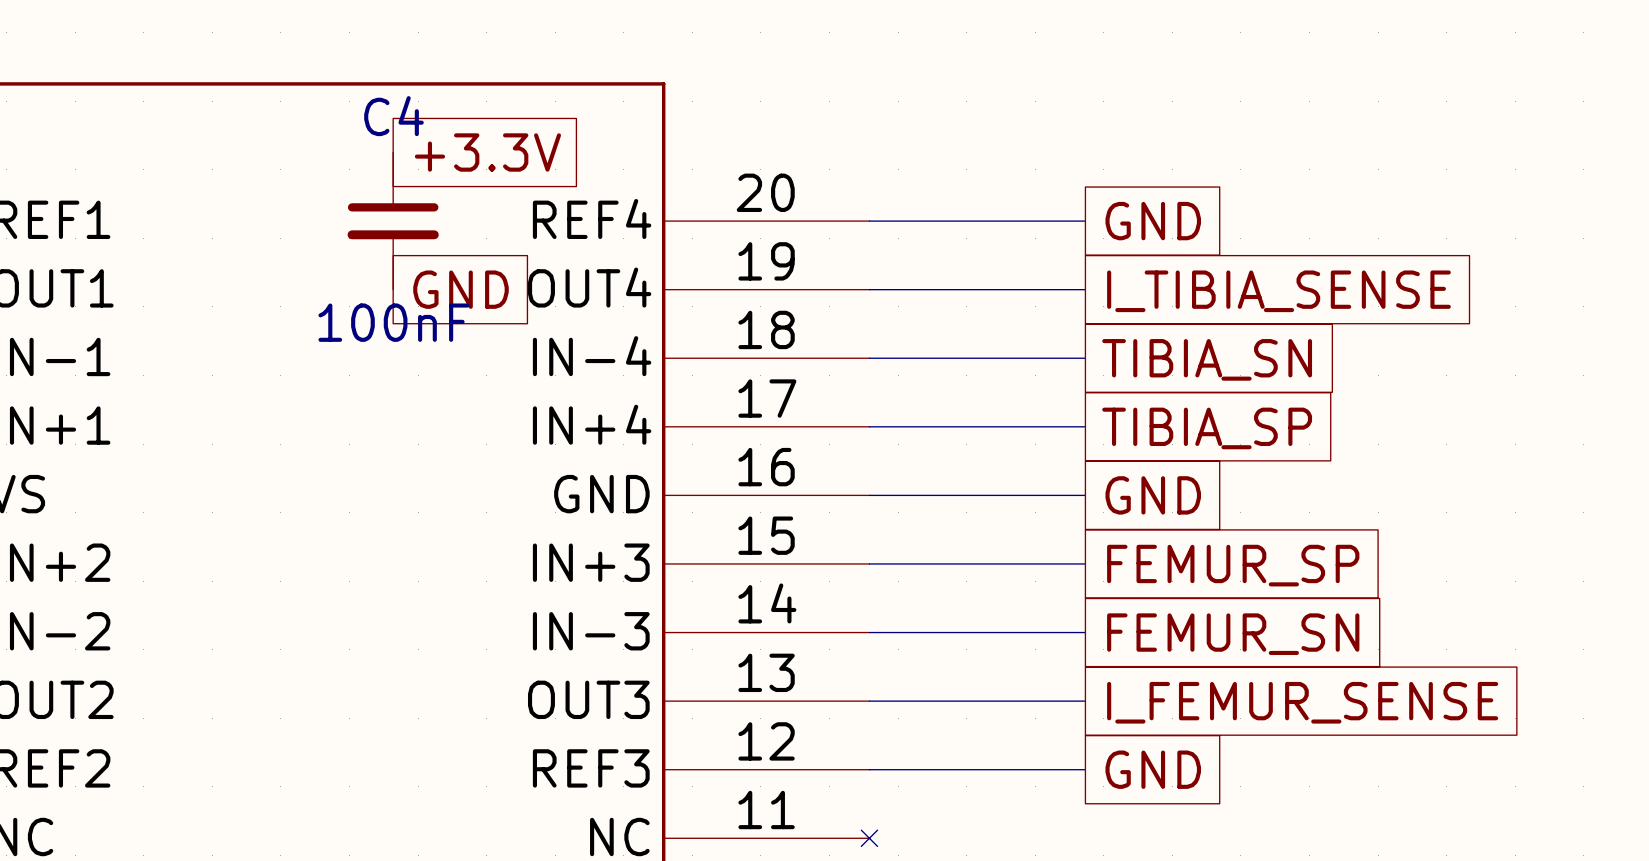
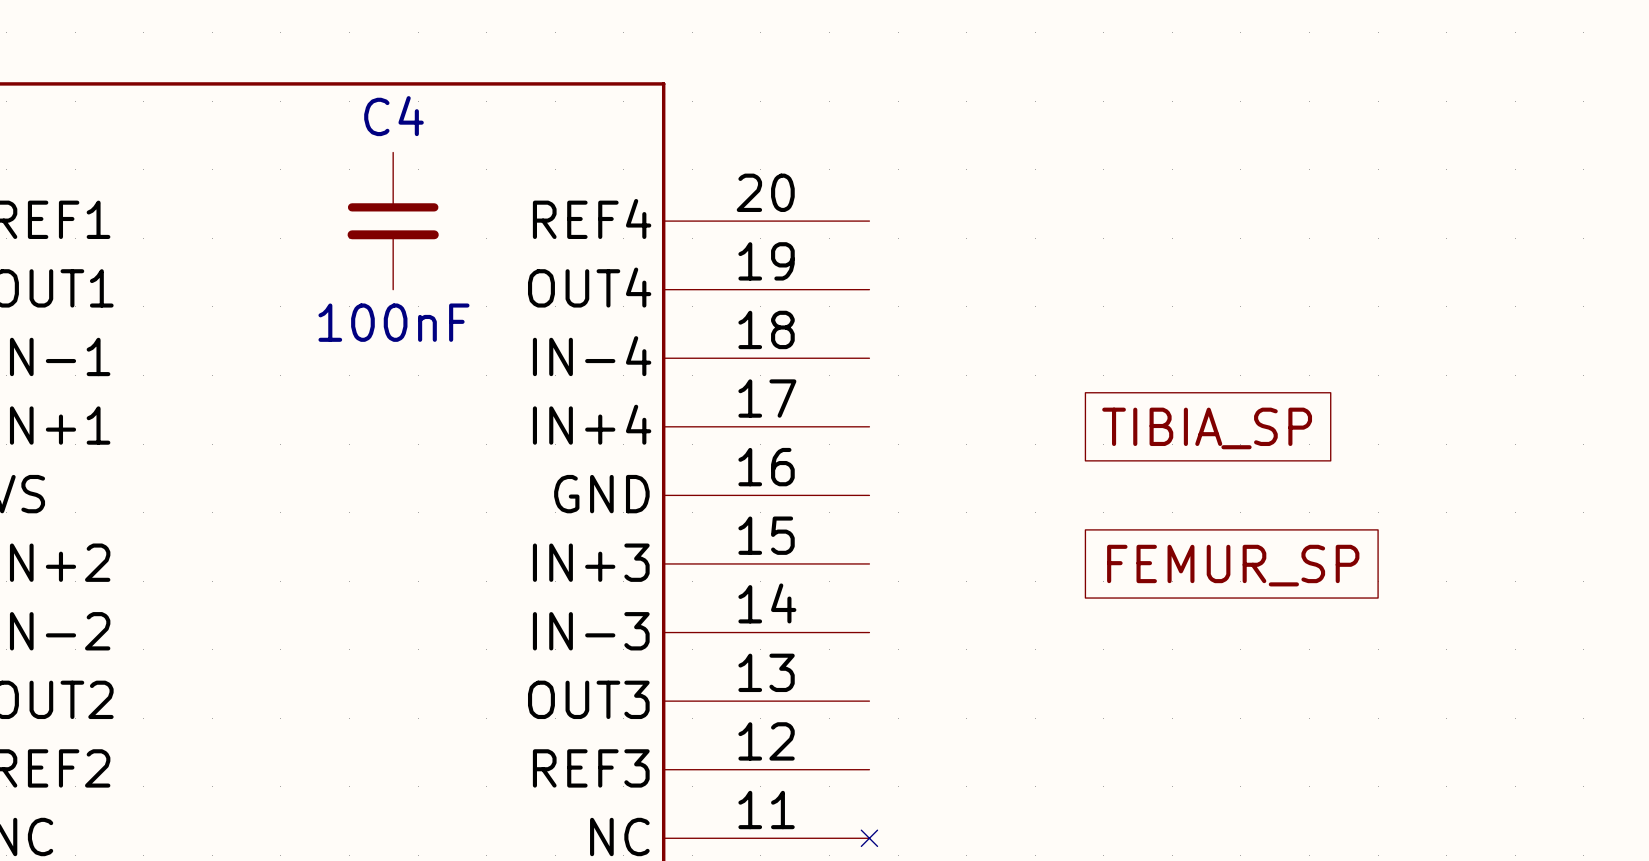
global label: +3.3V (487, 152) -> none
wire: (869, 221) (1085, 221) -> none
global label: GND (1153, 221) -> none
global label: GND (460, 289) -> none
wire: (869, 289) (1085, 289) -> none
global label: I_TIBIA_SENSE (1278, 291) -> none
wire: (869, 358) (1085, 358) -> none
global label: TIBIA_SN (1207, 359) -> none
wire: (869, 426) (1085, 426) -> none
wire: (869, 495) (1085, 495) -> none
global label: GND (1153, 495) -> none
wire: (869, 563) (1085, 563) -> none
wire: (869, 632) (1085, 632) -> none
global label: FEMUR_SN (1233, 634) -> none
wire: (869, 701) (1085, 701) -> none
global label: I_FEMUR_SENSE (1302, 702) -> none
wire: (869, 769) (1085, 769) -> none
global label: GND (1153, 769) -> none

